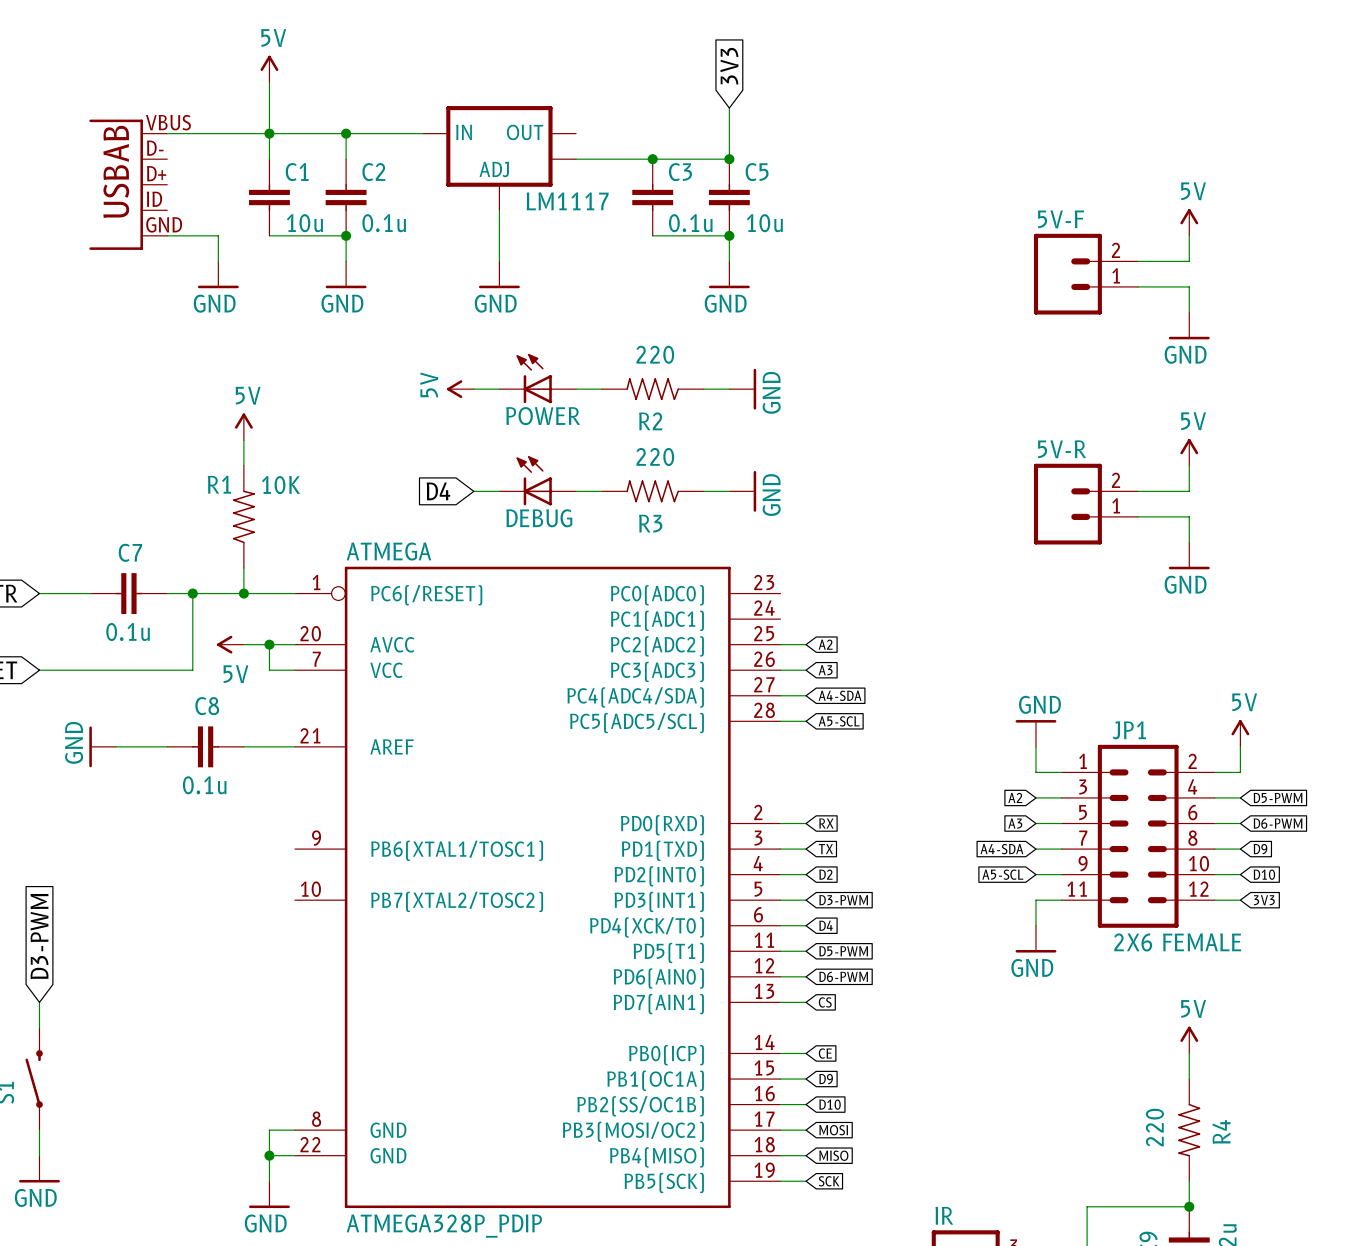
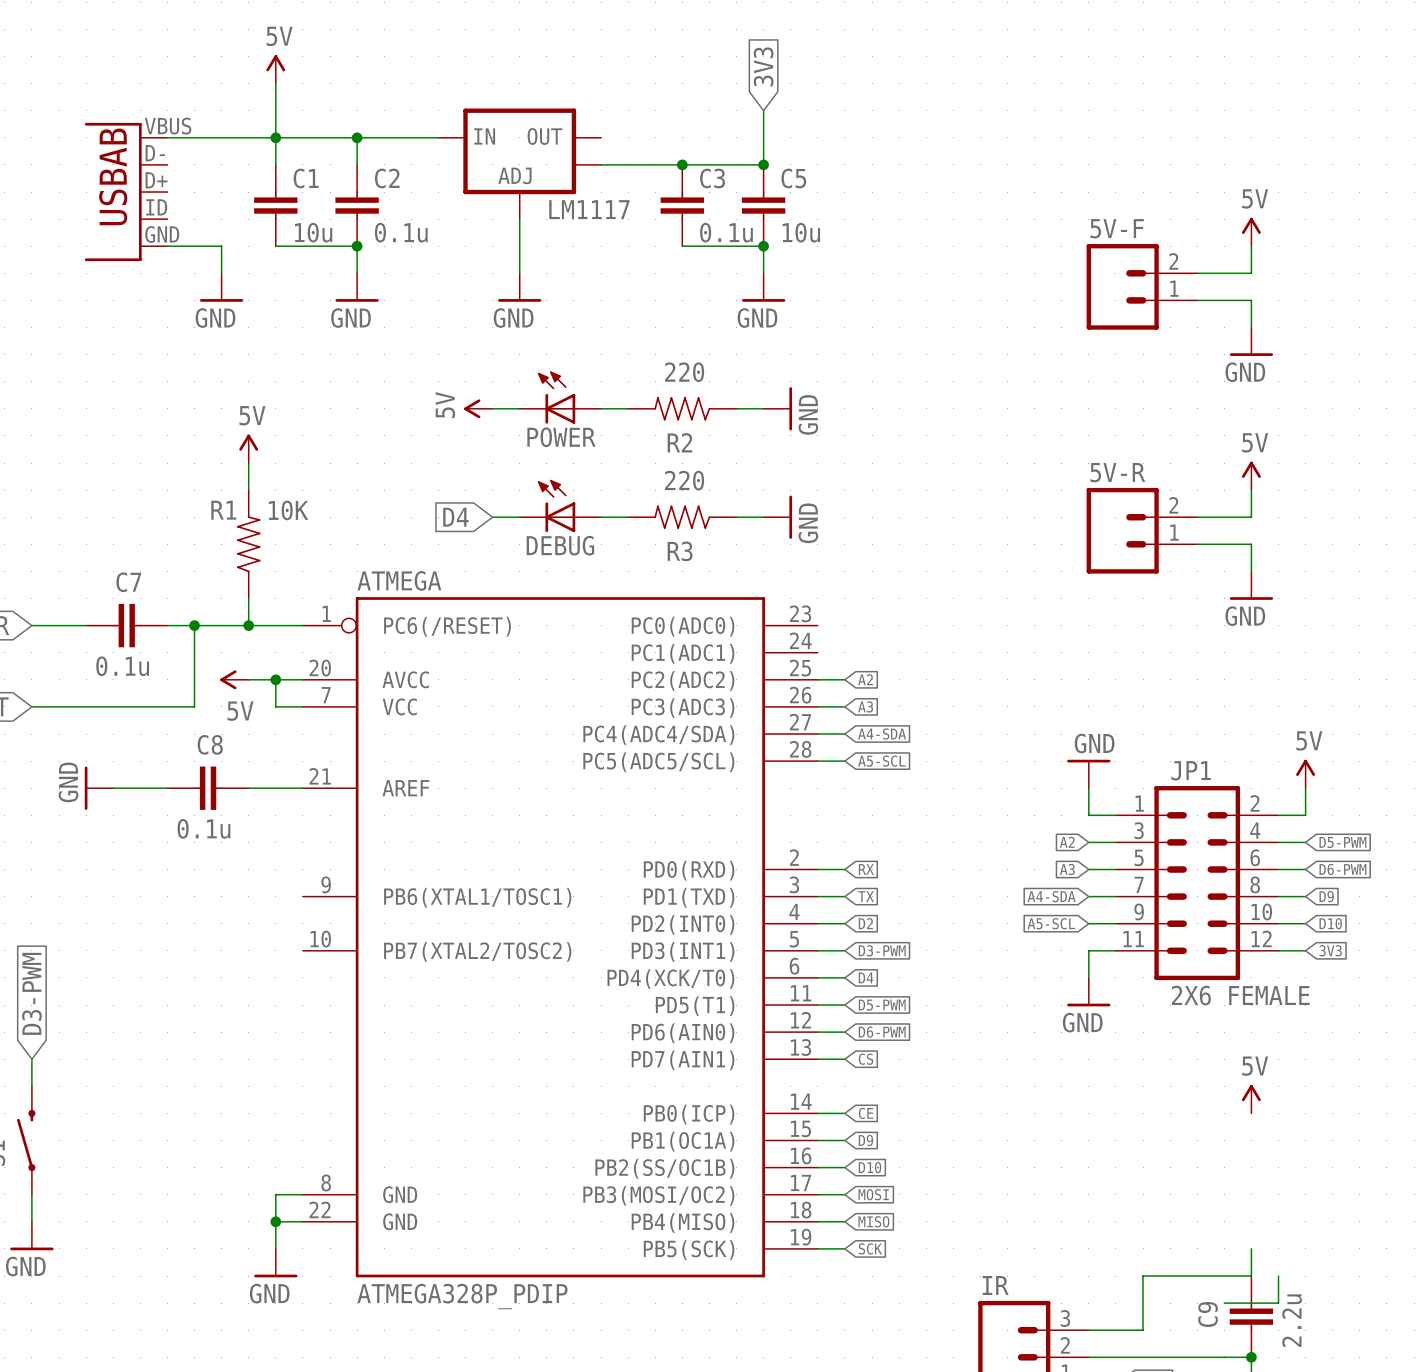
wire: (1189, 1053) (1189, 1079) -> none
R4: 220 (1189, 1130) -> none
junction: (1189, 1206) -> none
wire: none -> (1278, 1276) (1278, 1303) (1224, 1303)

